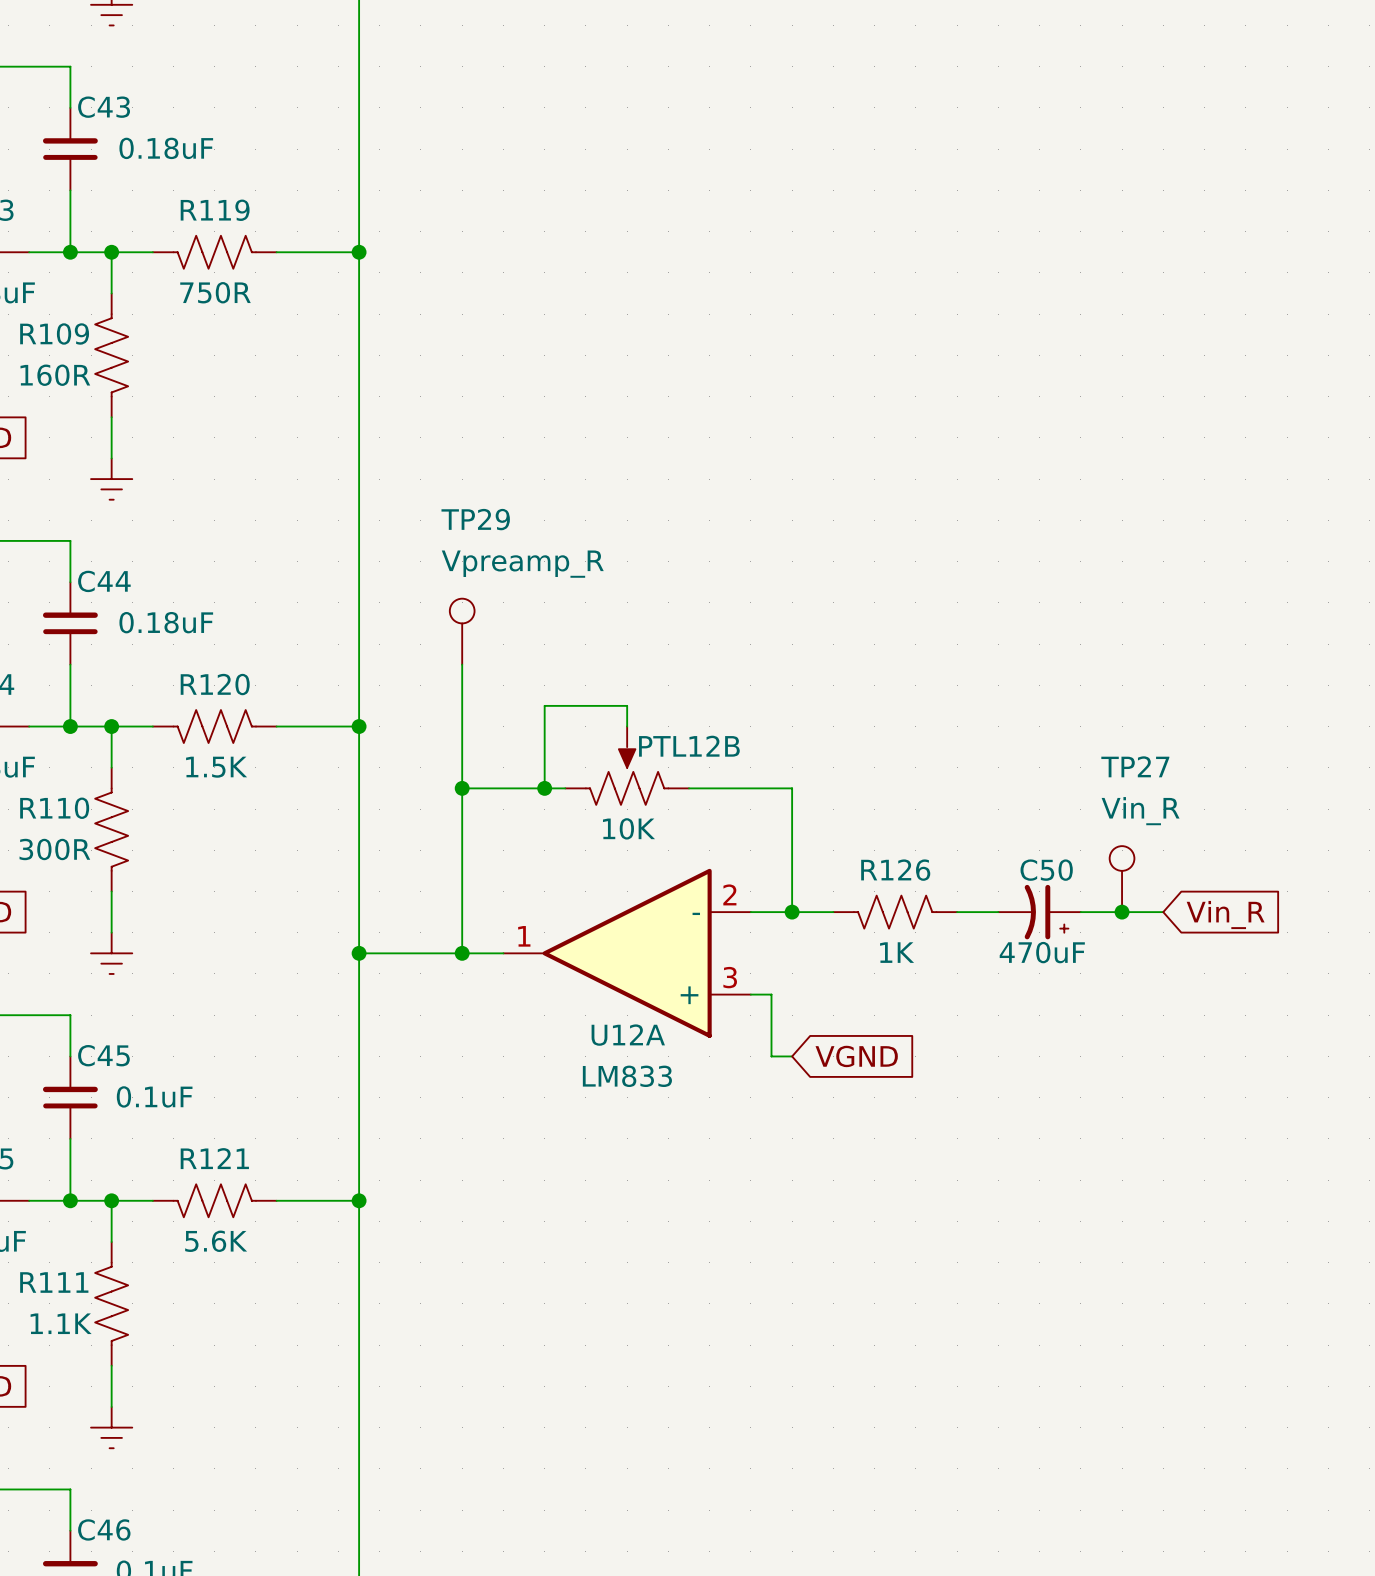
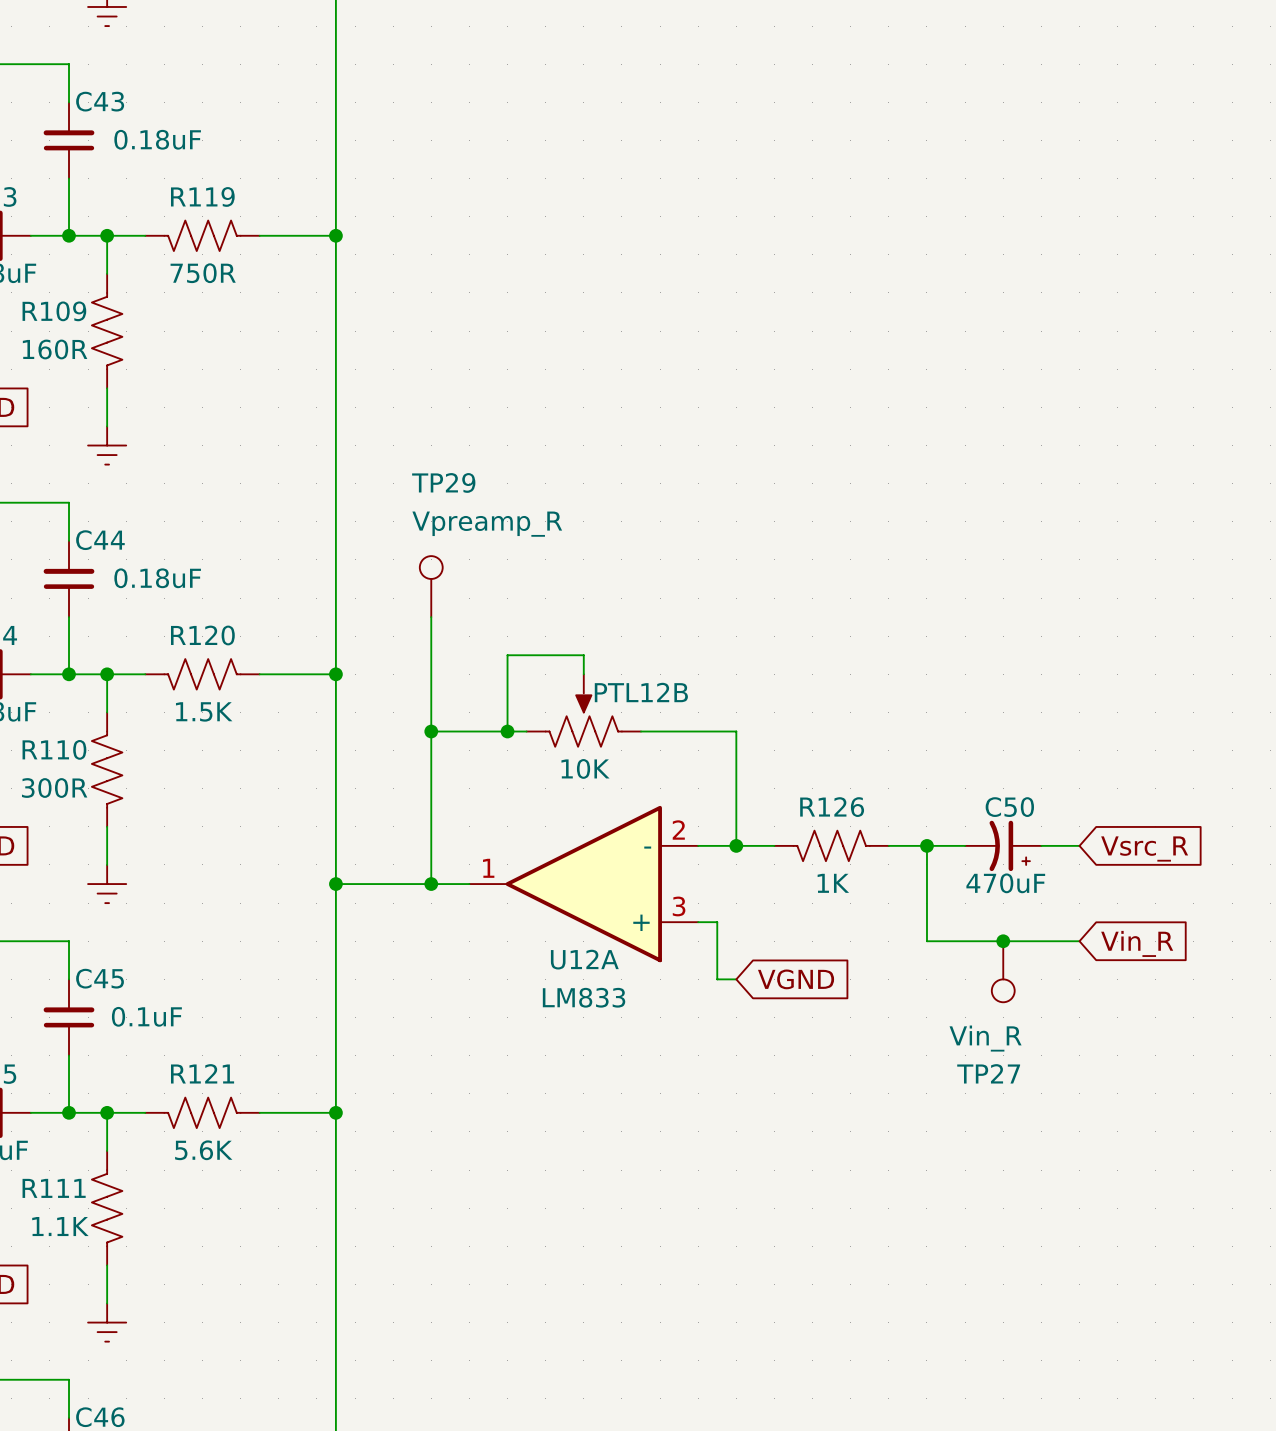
TP27 rotation: 0° (1122, 858) -> 180° (1003, 990)
TP27 position: (1122, 879) -> (1003, 971)
junction: none -> (926, 845)
wire: none -> (965, 845) (926, 845) (926, 941) (1079, 941)
C50 position: (1039, 912) -> (1003, 845)
junction: (1122, 912) -> none
global label: Vin_R (1225, 915) -> Vsrc_R (1144, 848)
junction: none -> (1003, 941)
global label: none -> Vin_R (1137, 943)

